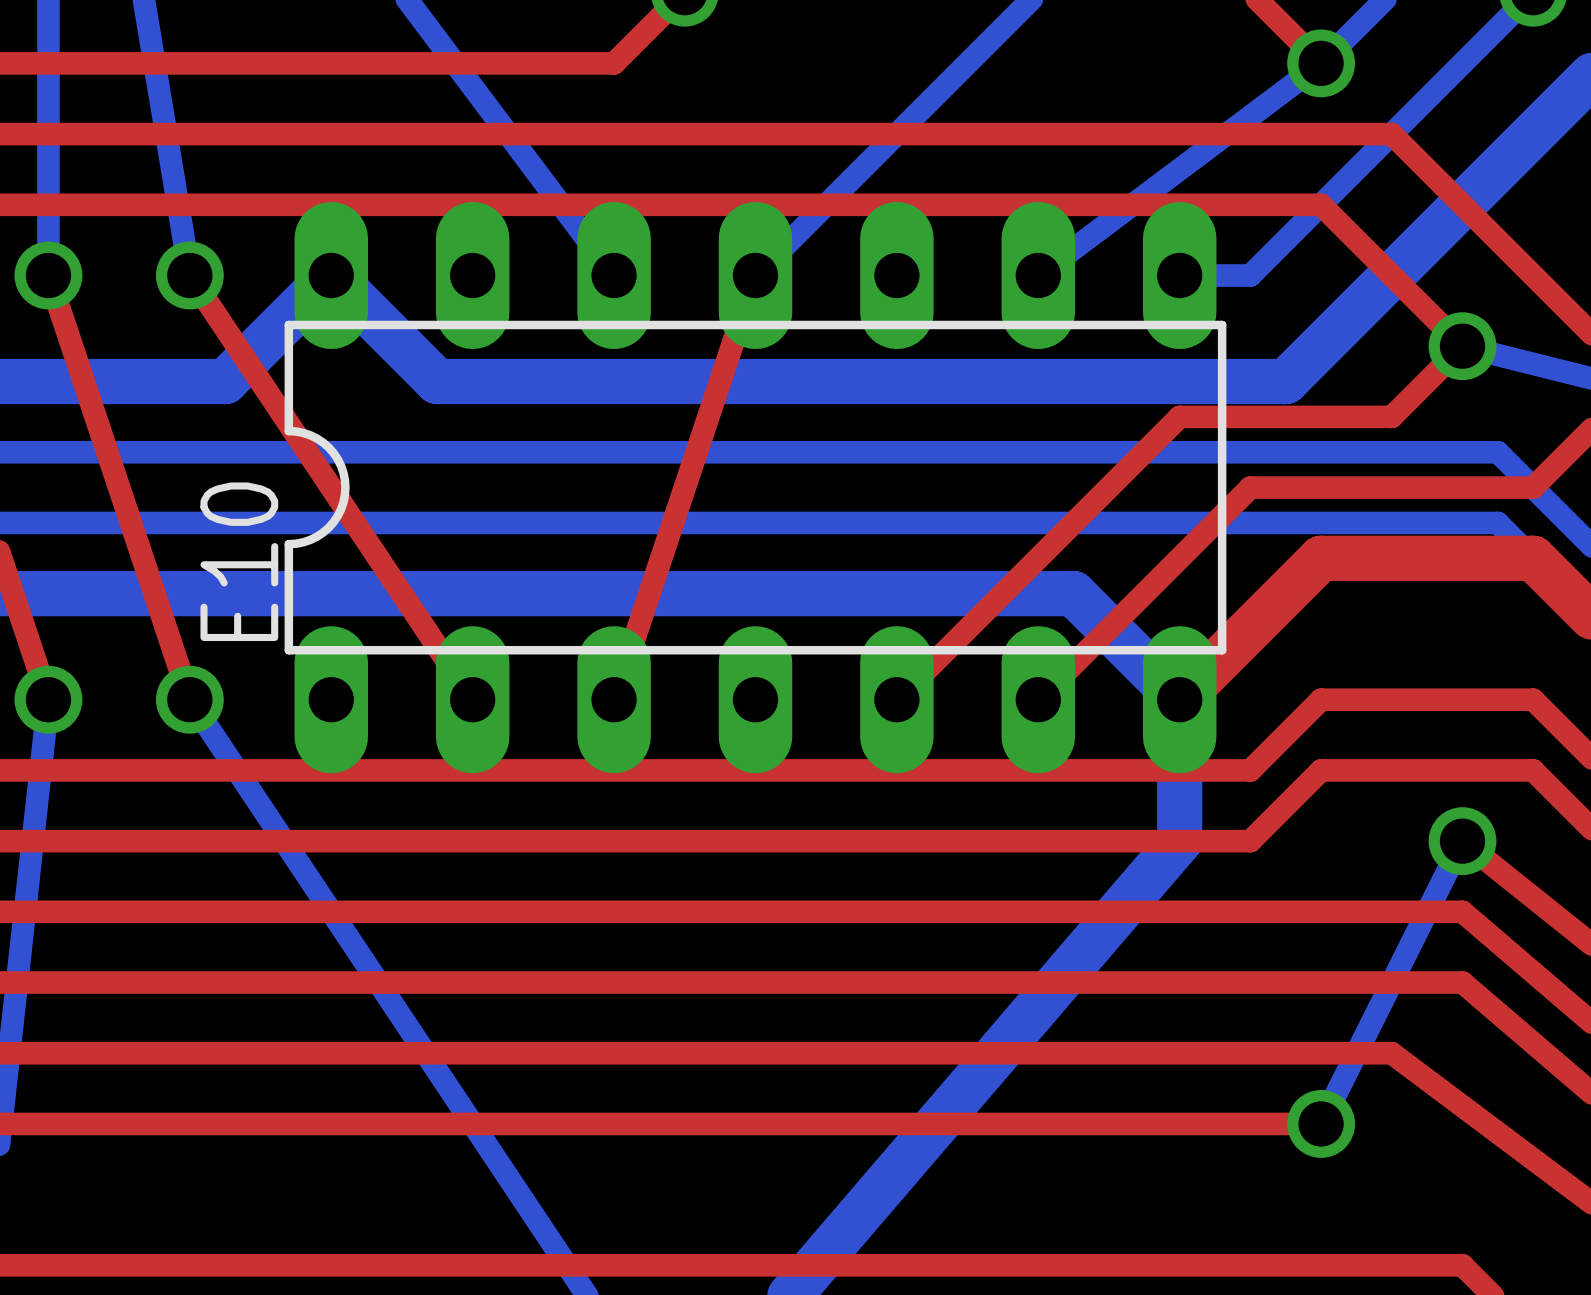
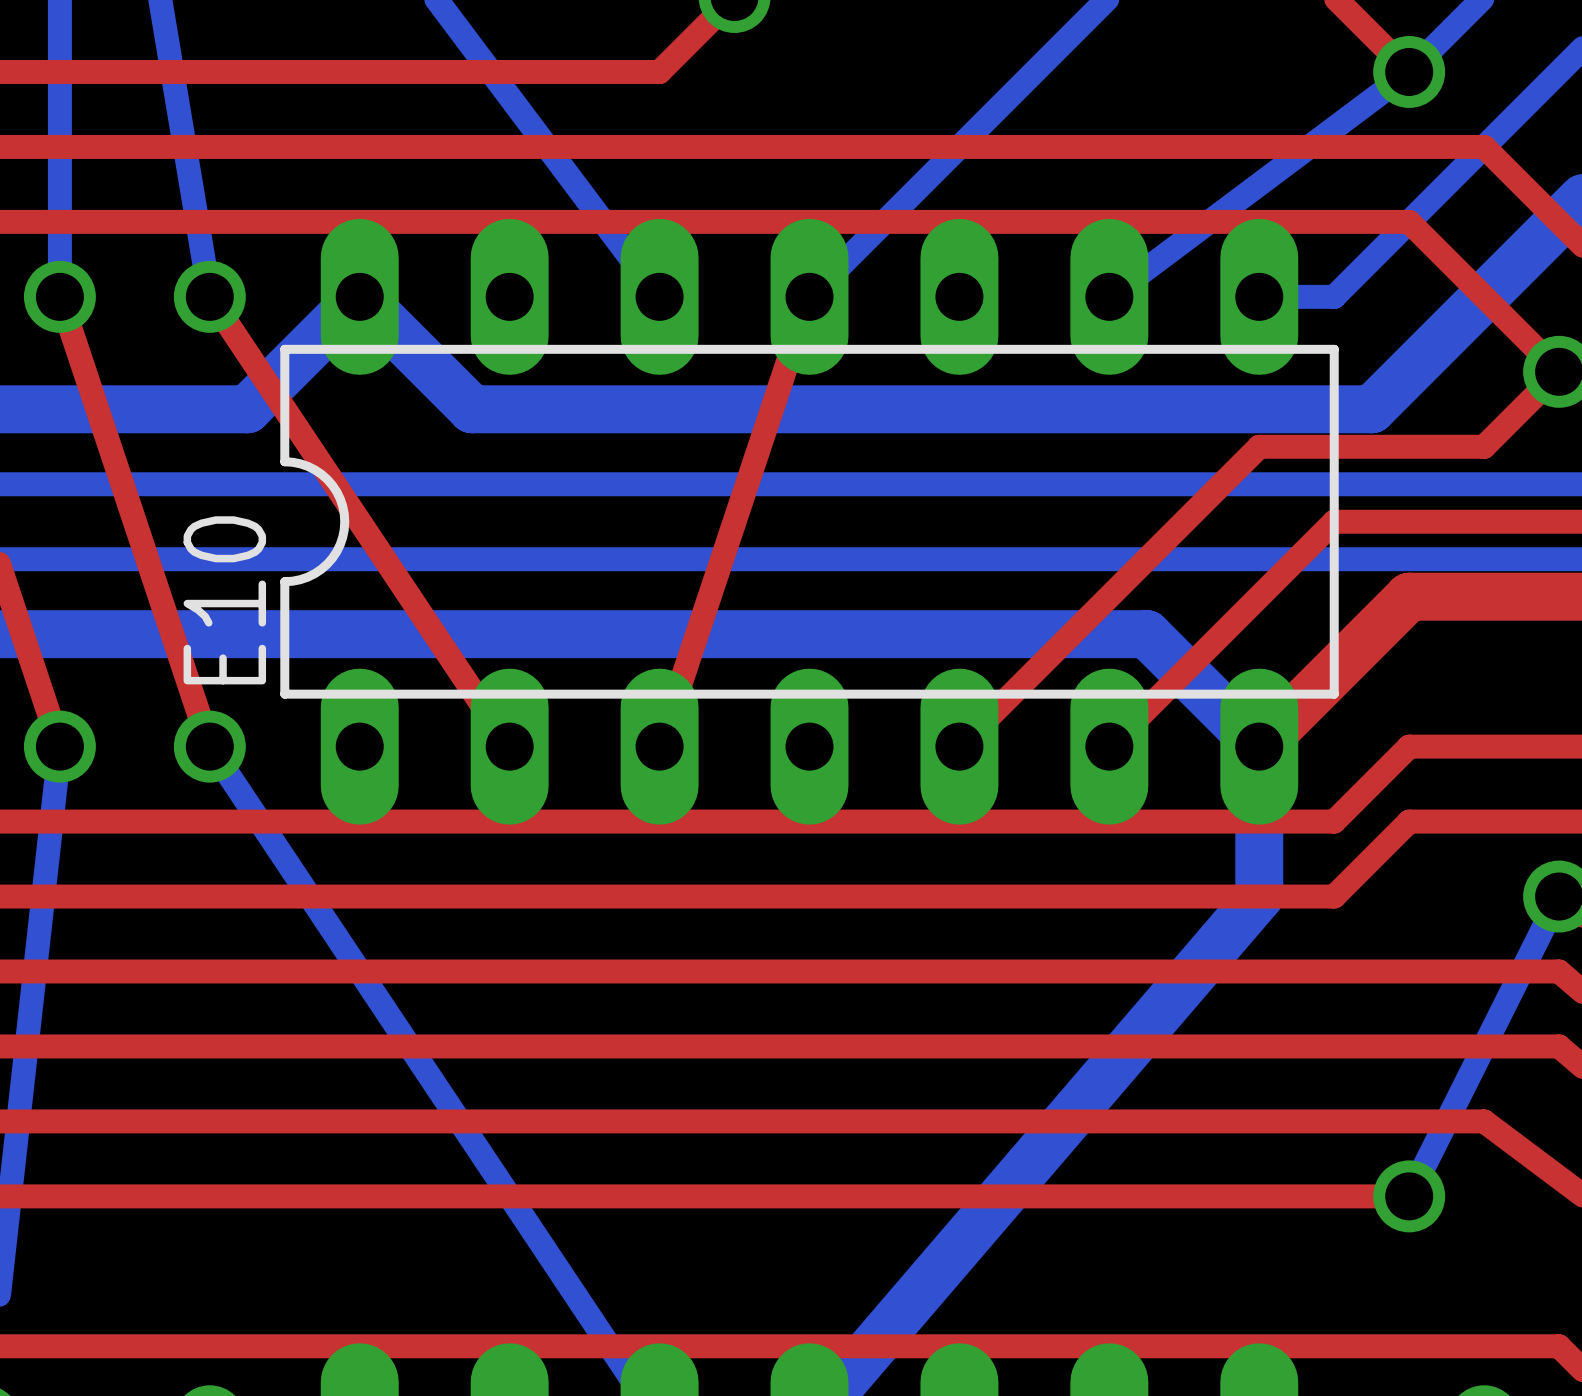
E10 footprint: [284, 201, 1227, 774] -> [280, 218, 1339, 825]
E10 name position: E10 (239, 561) -> E10 (224, 600)

